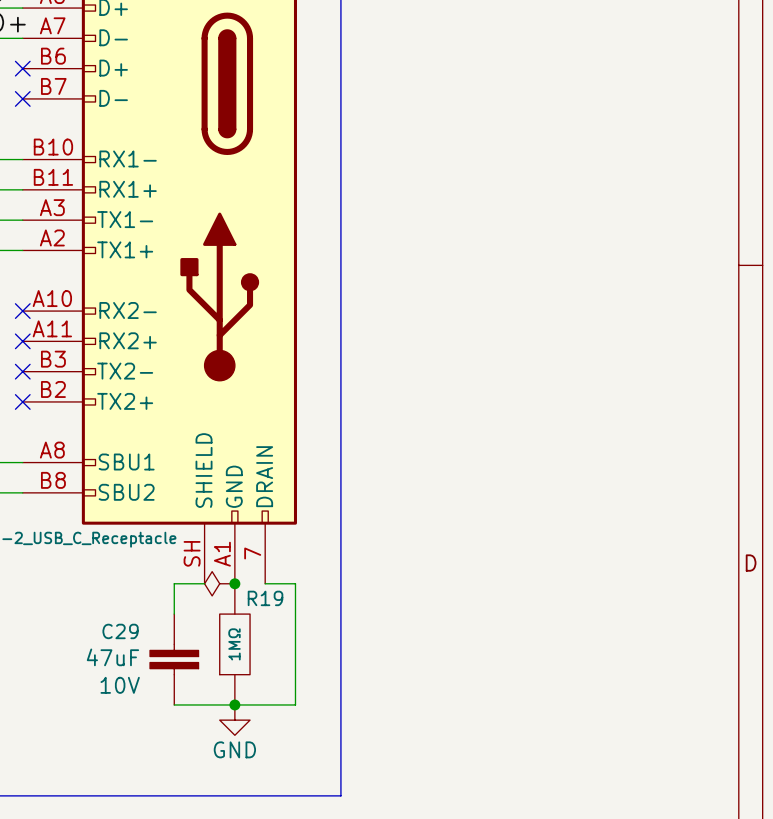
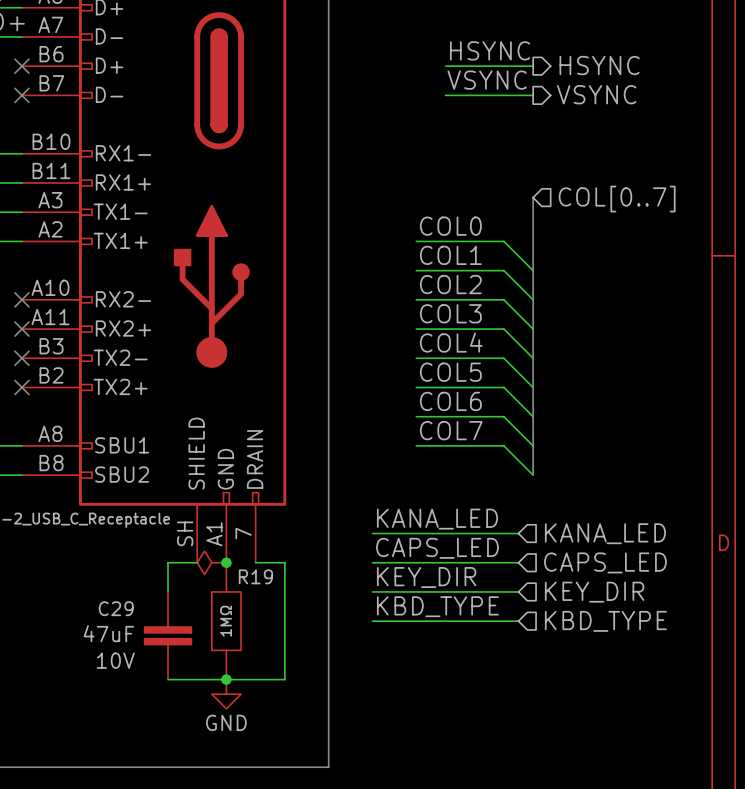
label: none -> HSYNC (490, 50)
hierarchical label: none -> HSYNC (599, 65)
wire: none -> (445, 66) (533, 66)
label: none -> VSYNC (487, 80)
wire: none -> (445, 95) (533, 95)
hierarchical label: none -> VSYNC (596, 94)
bus: none -> (533, 197) (533, 475)
hierarchical label: none -> COL[0..7] (617, 199)
label: none -> COL0 (450, 226)
wire: none -> (416, 241) (503, 241) (533, 270)
label: none -> COL1 (450, 255)
wire: none -> (416, 270) (503, 270) (533, 299)
label: none -> COL2 (450, 284)
wire: none -> (416, 299) (503, 299) (533, 329)
label: none -> COL3 (450, 313)
wire: none -> (416, 329) (503, 329) (533, 358)
label: none -> COL4 (451, 342)
wire: none -> (416, 358) (503, 358) (533, 387)
label: none -> COL5 (450, 372)
wire: none -> (416, 387) (503, 387) (533, 416)
label: none -> COL6 (450, 401)
wire: none -> (416, 416) (503, 416) (533, 445)
label: none -> COL7 (451, 430)
wire: none -> (416, 445) (503, 445) (533, 475)
label: none -> KANA_LED (437, 519)
wire: none -> (372, 533) (518, 533)
hierarchical label: none -> KANA_LED (605, 533)
label: none -> CAPS_LED (437, 548)
wire: none -> (372, 562) (518, 562)
hierarchical label: none -> CAPS_LED (605, 562)
label: none -> KEY_DIR (426, 577)
wire: none -> (372, 591) (518, 591)
hierarchical label: none -> KEY_DIR (594, 592)
label: none -> KBD_TYPE (437, 606)
wire: none -> (372, 621) (518, 621)
hierarchical label: none -> KBD_TYPE (605, 621)

